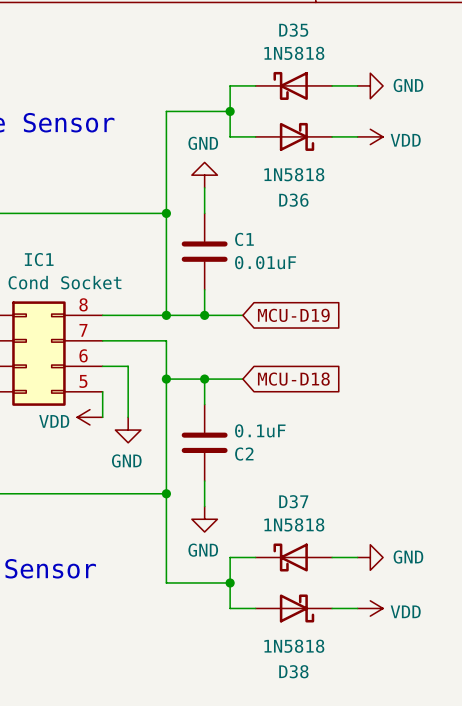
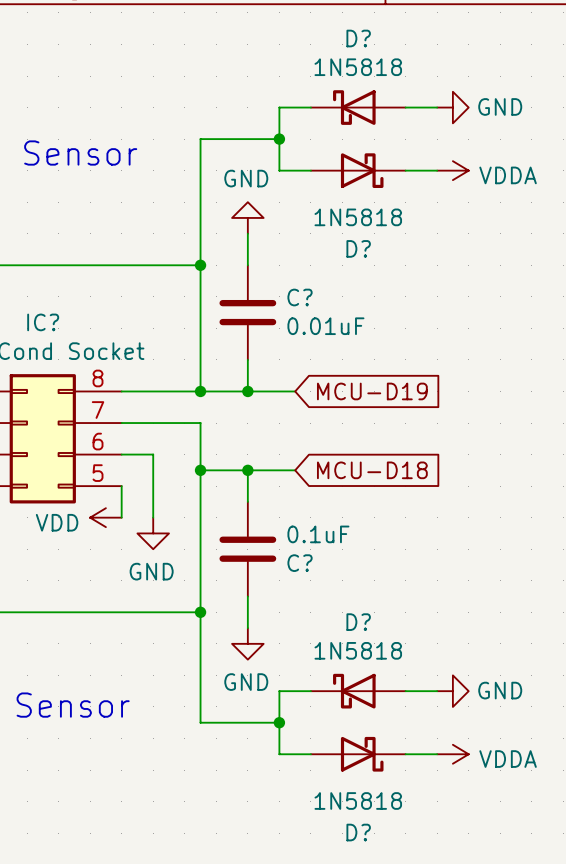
D35 name: D35 (293, 30) -> D? (358, 38)
power symbol: VDD (370, 136) -> VDDA (452, 170)
D36 name: D36 (293, 200) -> D? (358, 248)
C1 name: C1 (244, 239) -> C? (300, 297)
IC1 name: IC1 (39, 259) -> IC? (43, 322)
C2 name: C2 (244, 454) -> C? (300, 563)
D37 name: D37 (293, 501) -> D? (358, 622)
power symbol: VDD (370, 608) -> VDDA (452, 754)
D38 name: D38 (293, 671) -> D? (358, 832)

